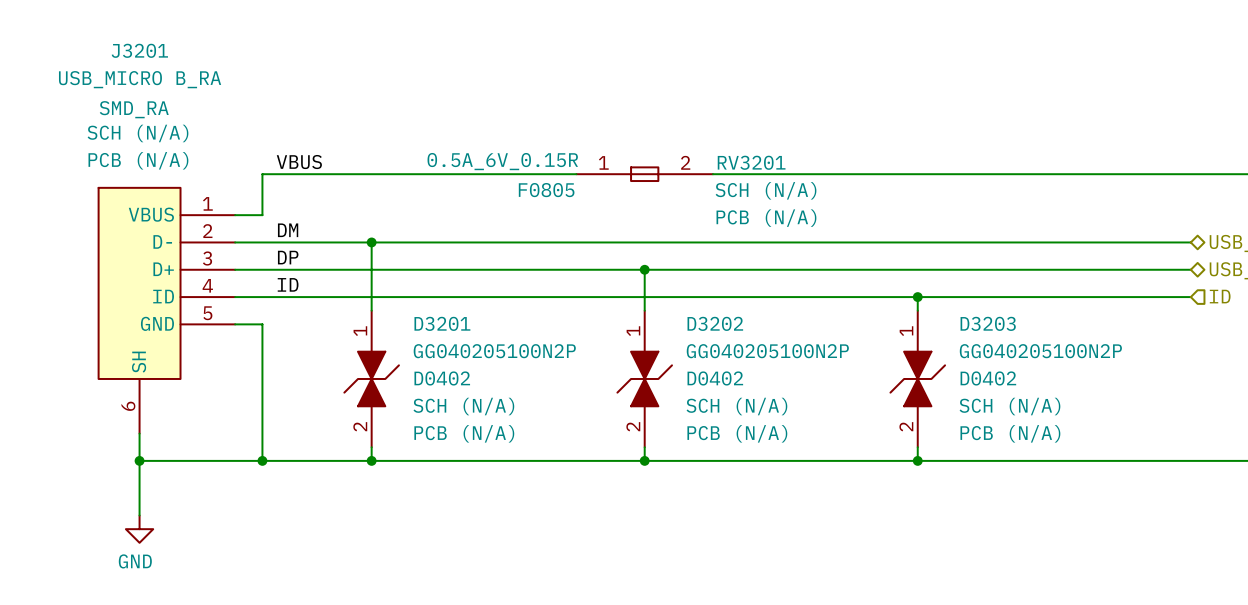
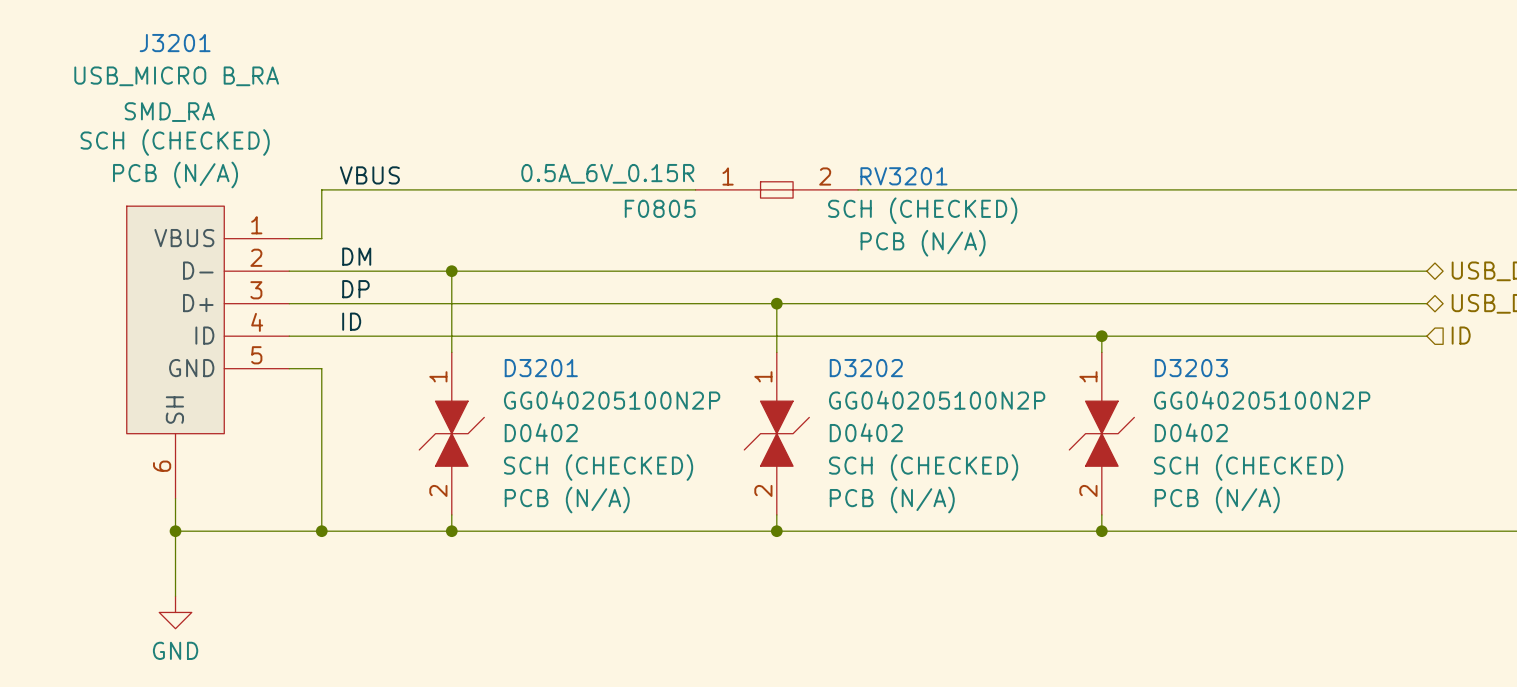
J3201 text: SCH (N/A) (137, 133) -> SCH (CHECKED) (175, 142)
RV3201 text: SCH (N/A) (766, 190) -> SCH (CHECKED) (922, 210)
D3201 text: SCH (N/A) (463, 406) -> SCH (CHECKED) (598, 467)
D3202 text: SCH (N/A) (736, 406) -> SCH (CHECKED) (923, 467)
D3203 text: SCH (N/A) (1009, 406) -> SCH (CHECKED) (1248, 467)

